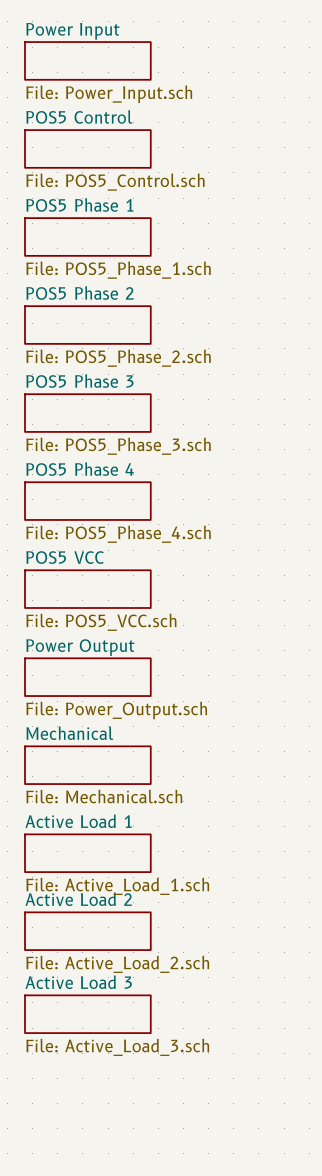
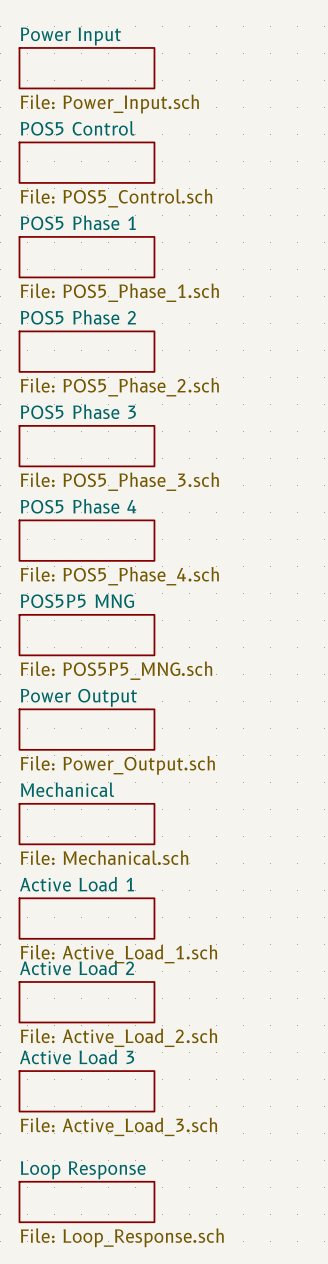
sheet POS5 VCC name: POS5 VCC (65, 557) -> POS5P5 MNG (77, 601)
sheet POS5 VCC value: File: POS5_VCC.sch (101, 622) -> File: POS5P5_MNG.sch (116, 670)
sheet Loop Response: none -> File: Loop_Response.sch (86, 1202)

